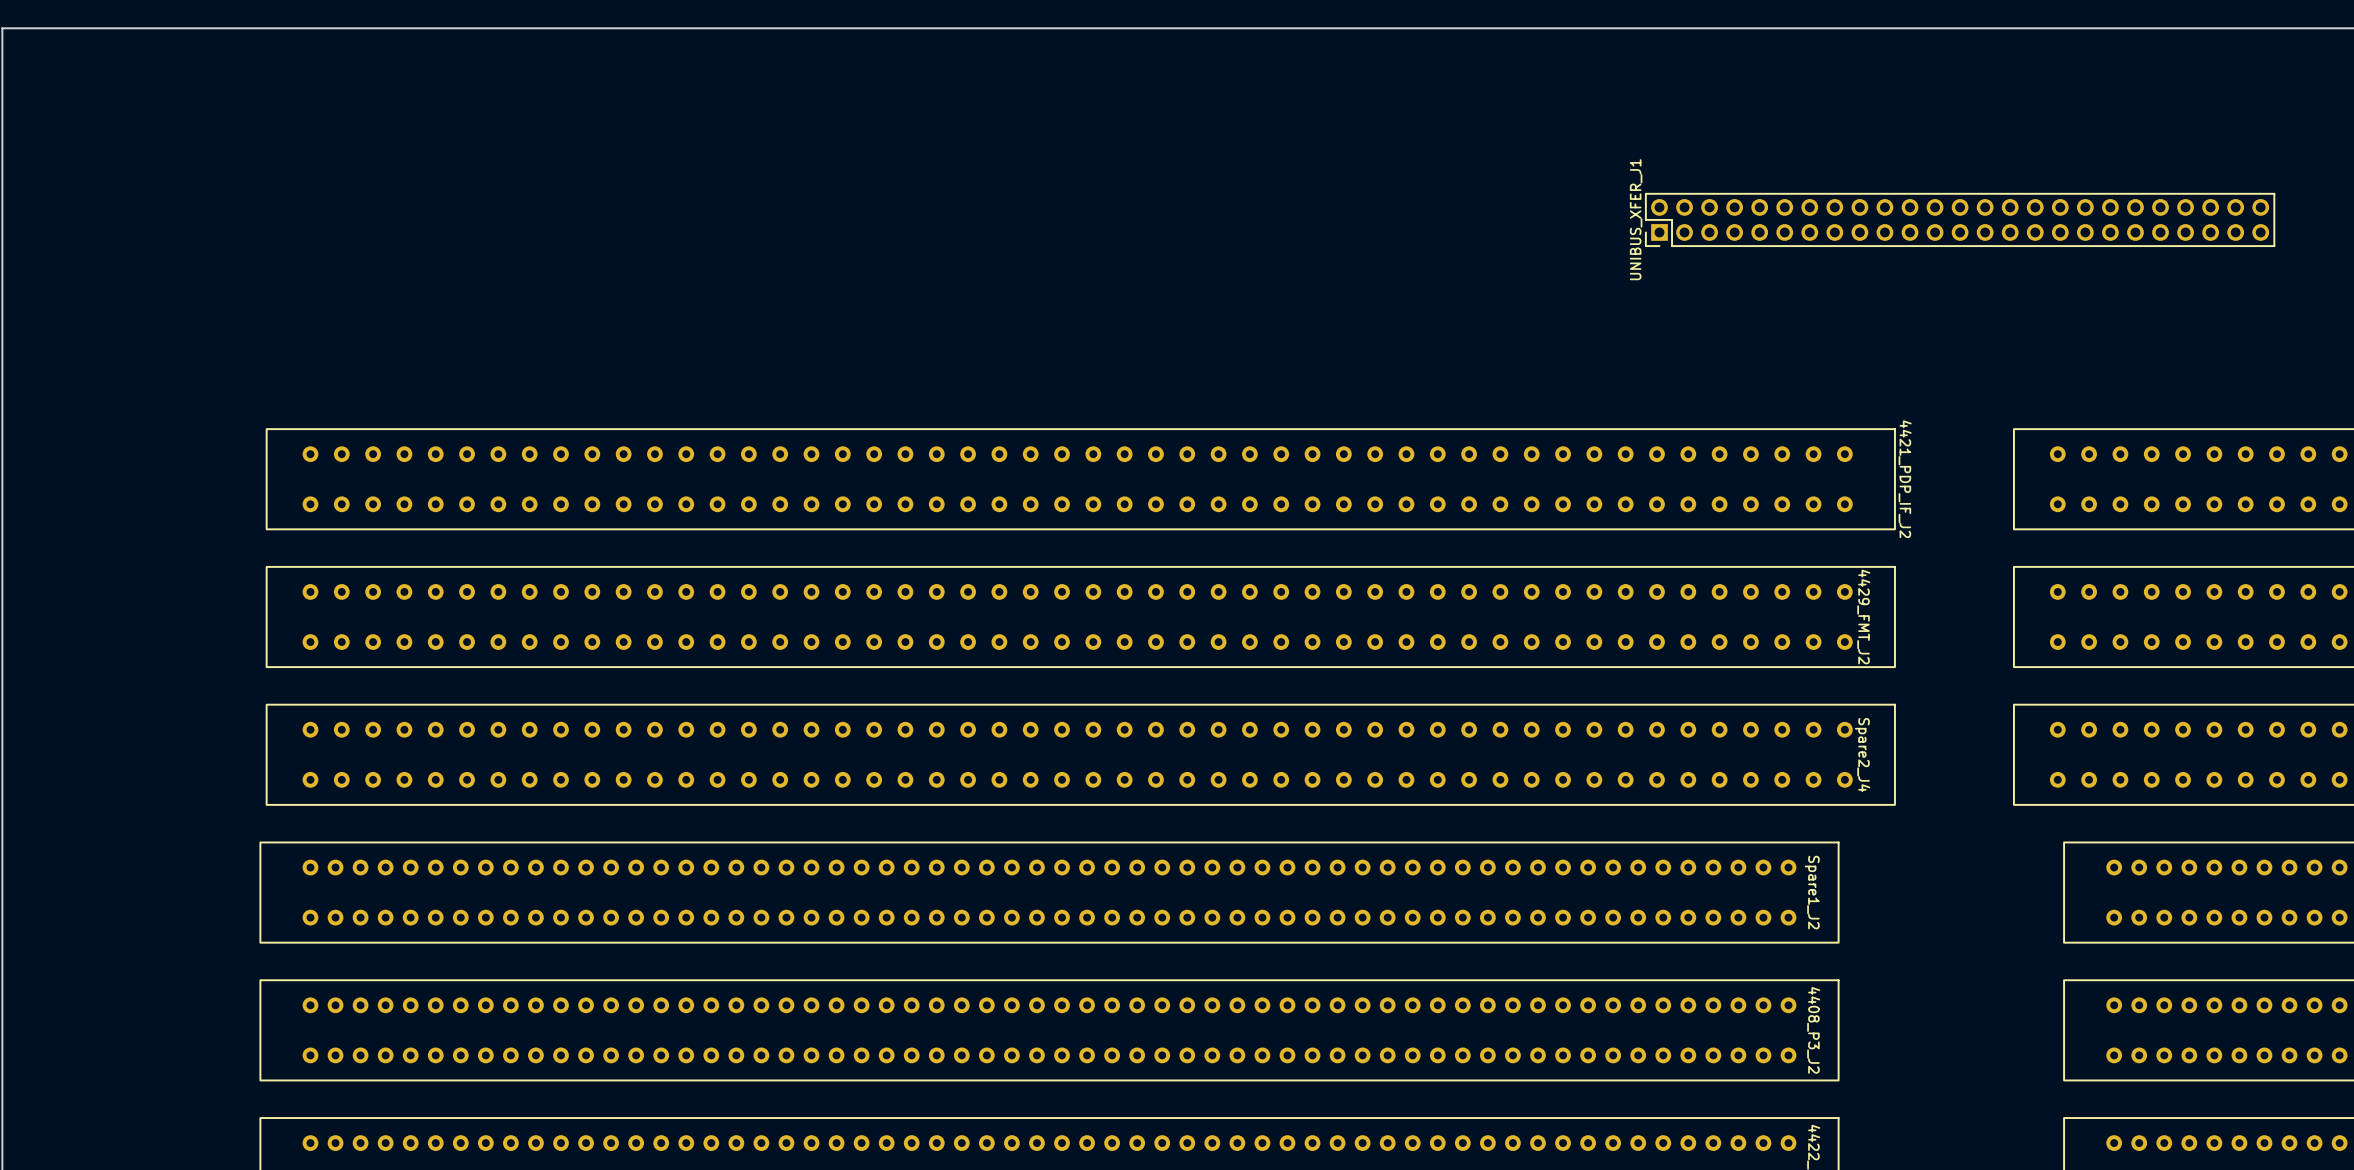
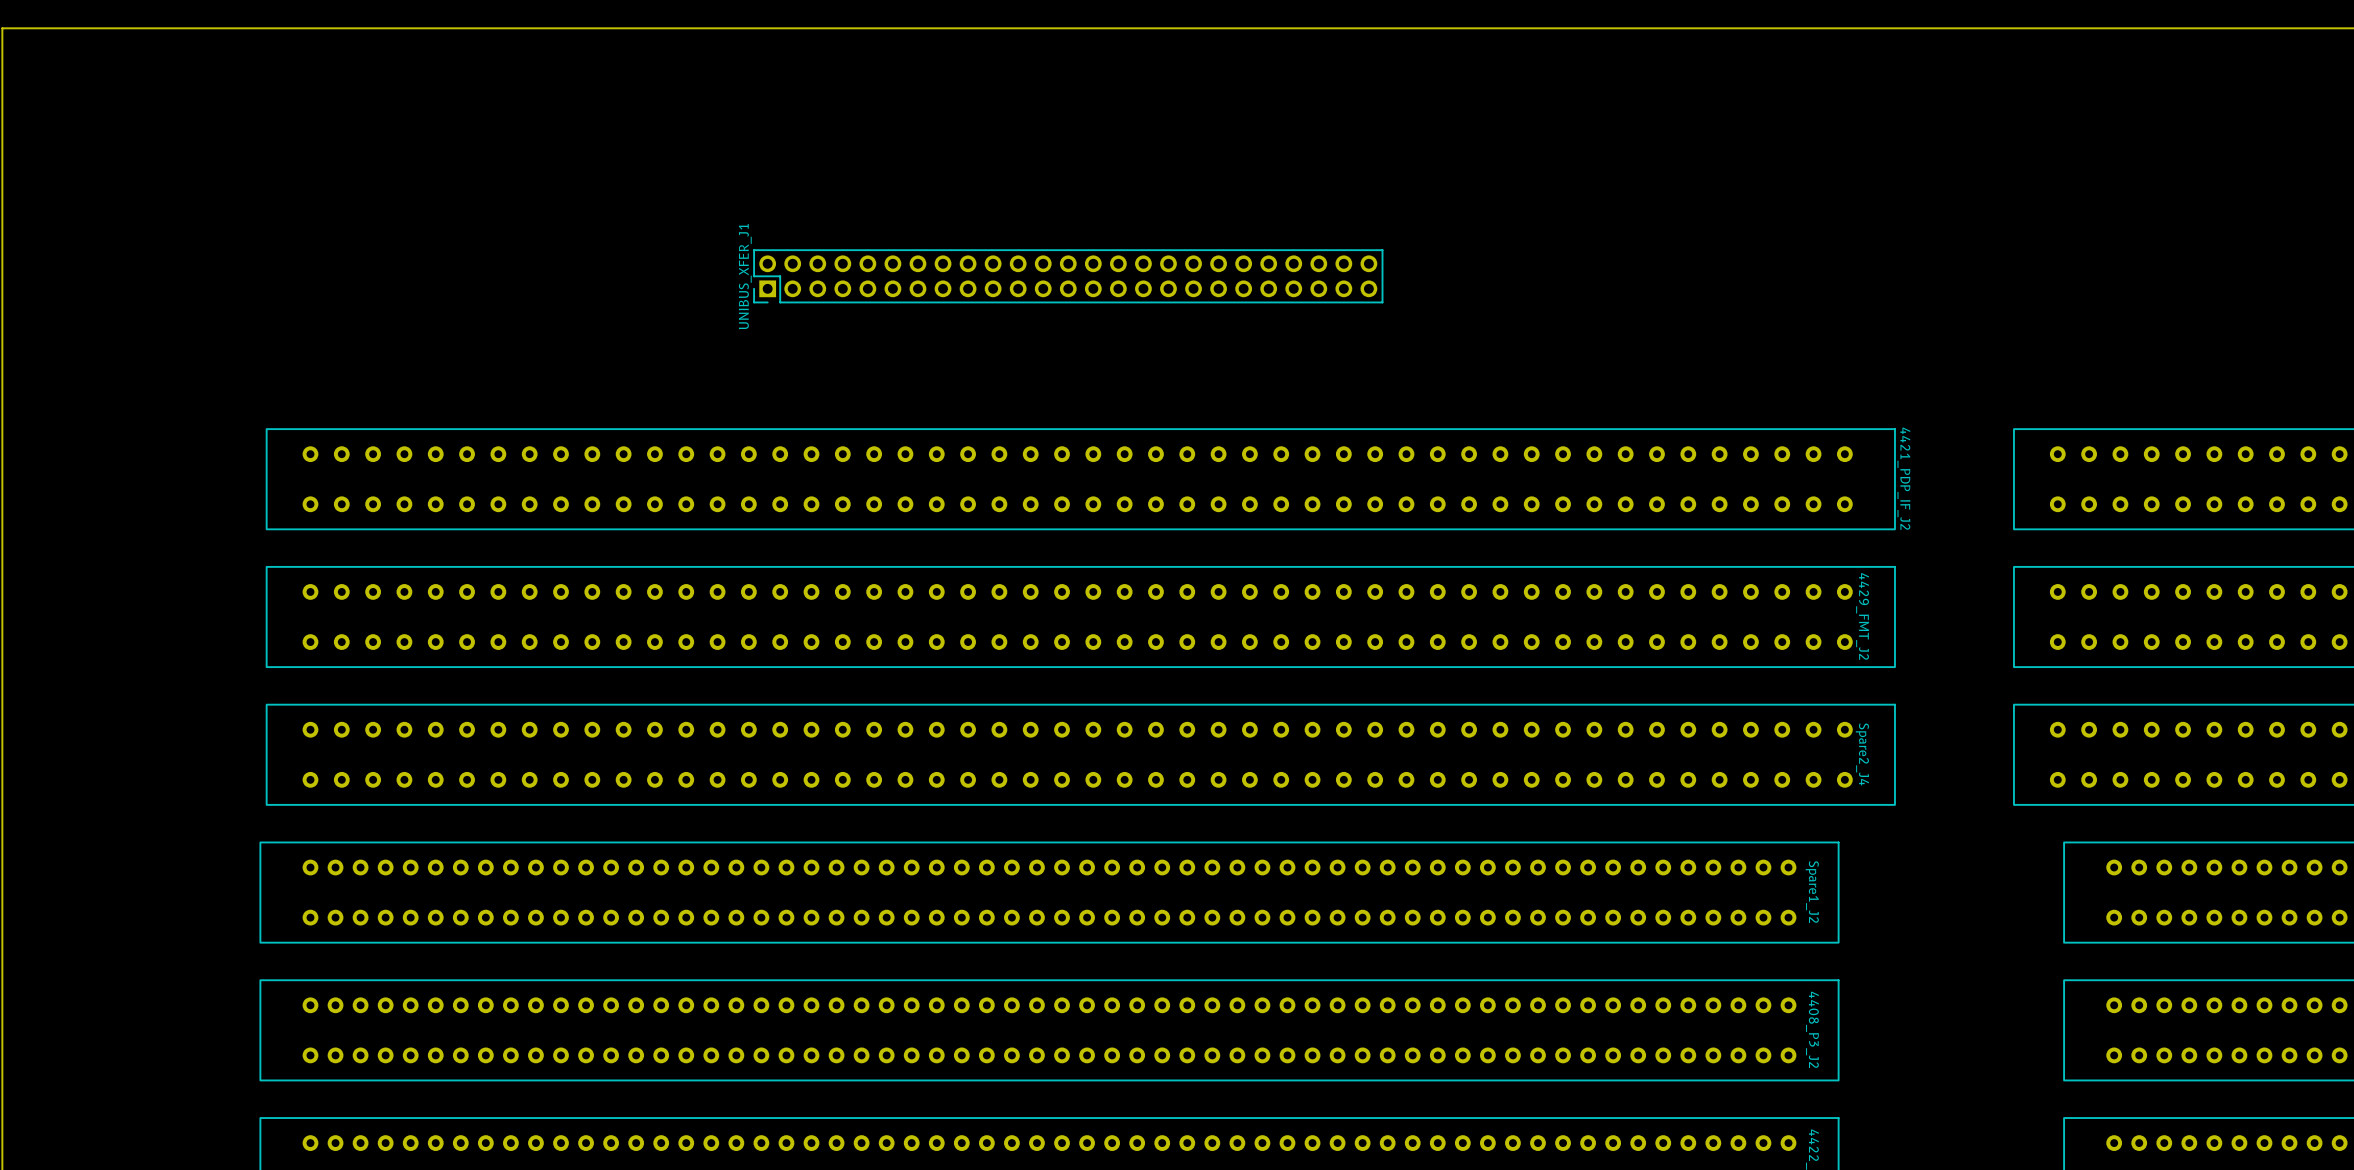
UNIBUS_XFER_J1 position: (1960, 219) -> (1068, 276)

